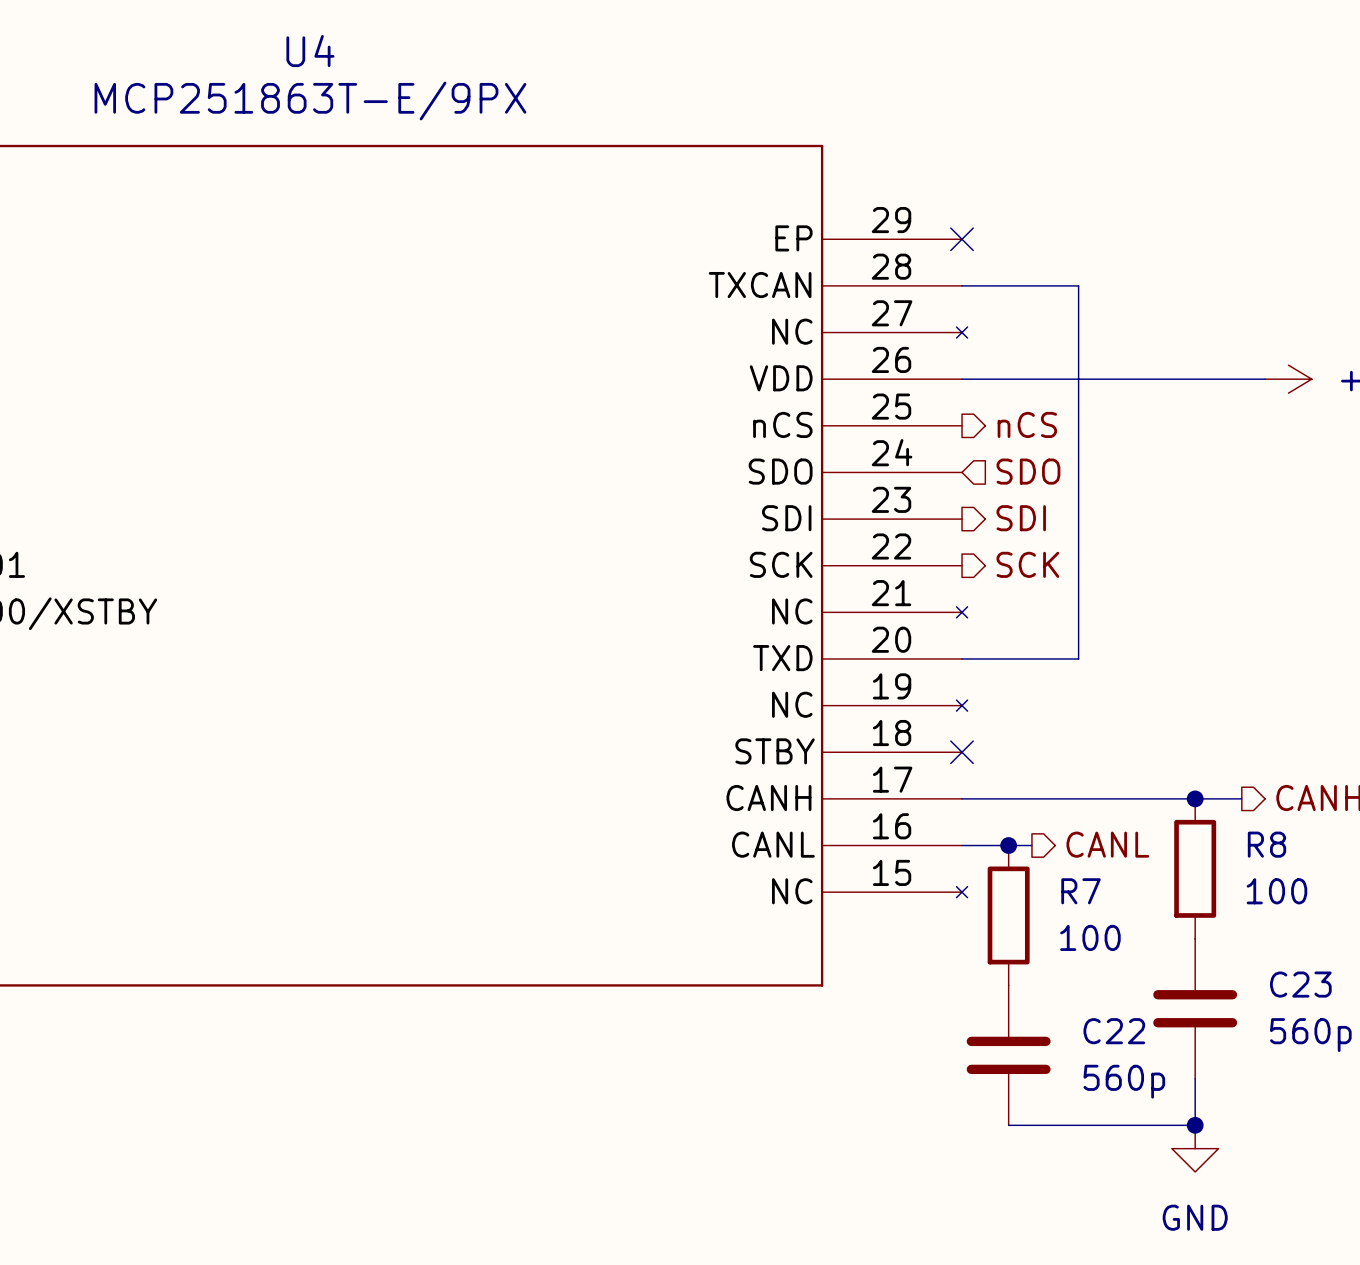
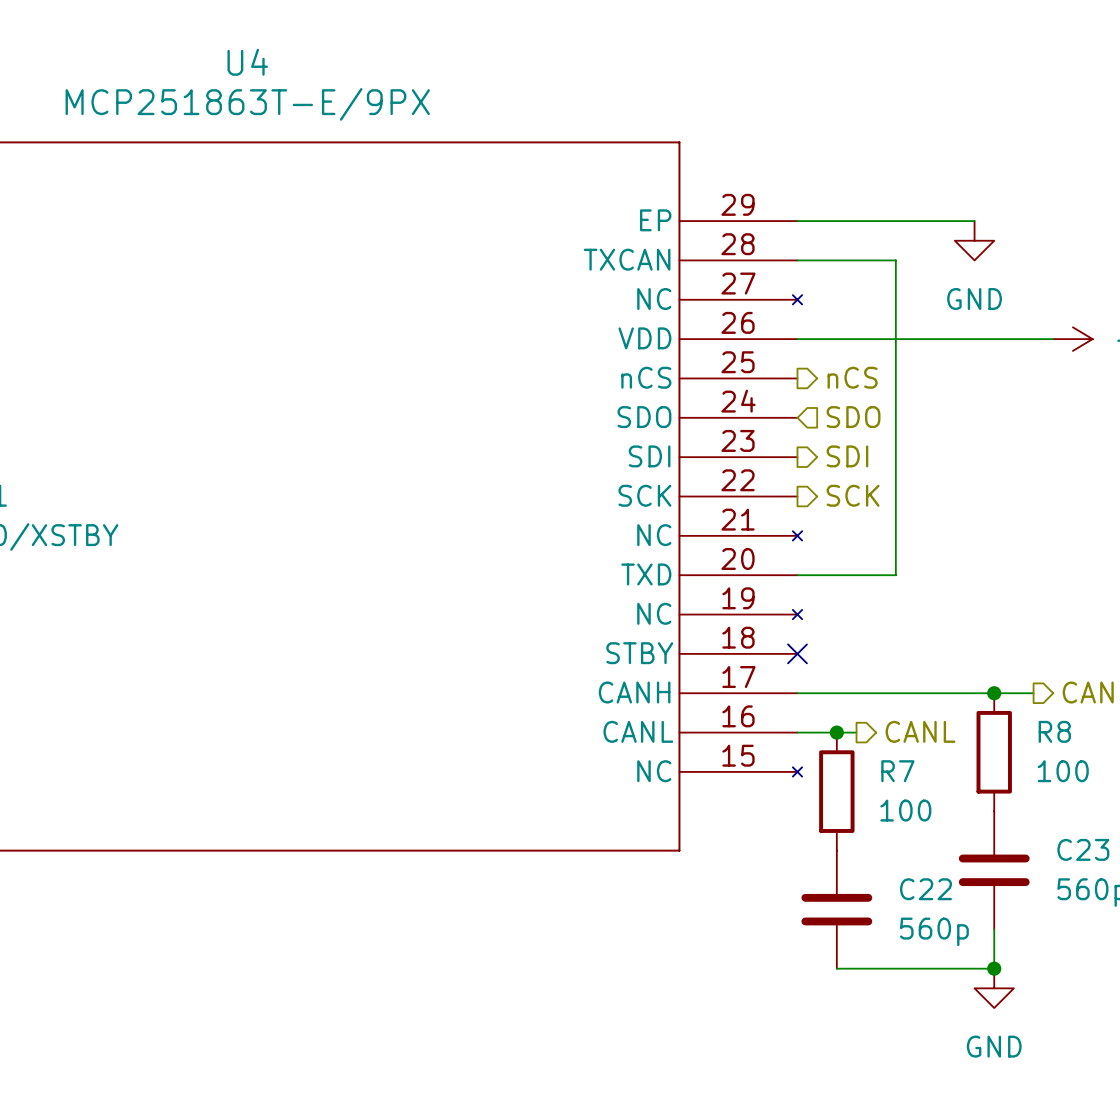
wire: none -> (797, 221) (974, 221)
no-connect mark: (962, 239) -> none
power symbol: none -> GND (974, 240)

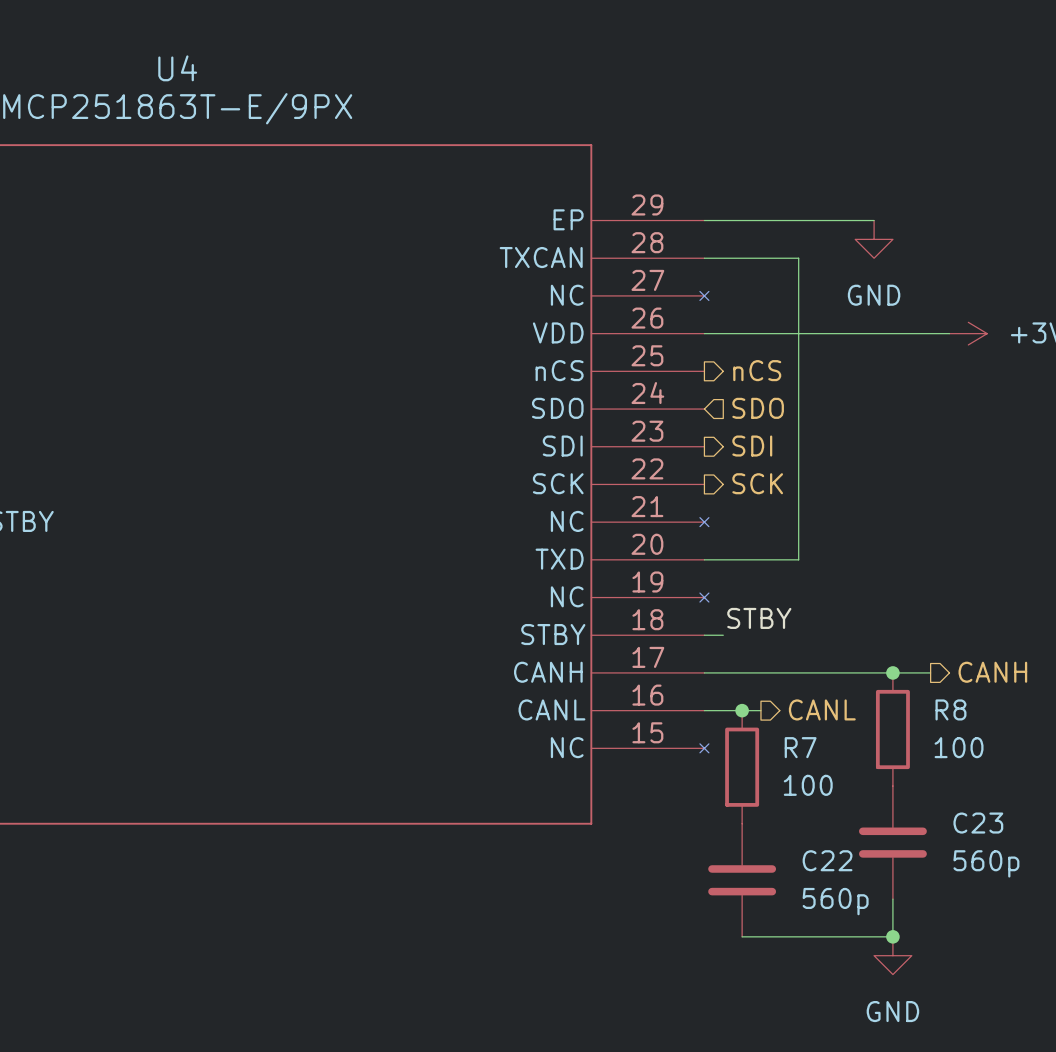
label: none -> STBY (759, 618)
wire: none -> (704, 635) (723, 635)
no-connect mark: (797, 653) -> none

